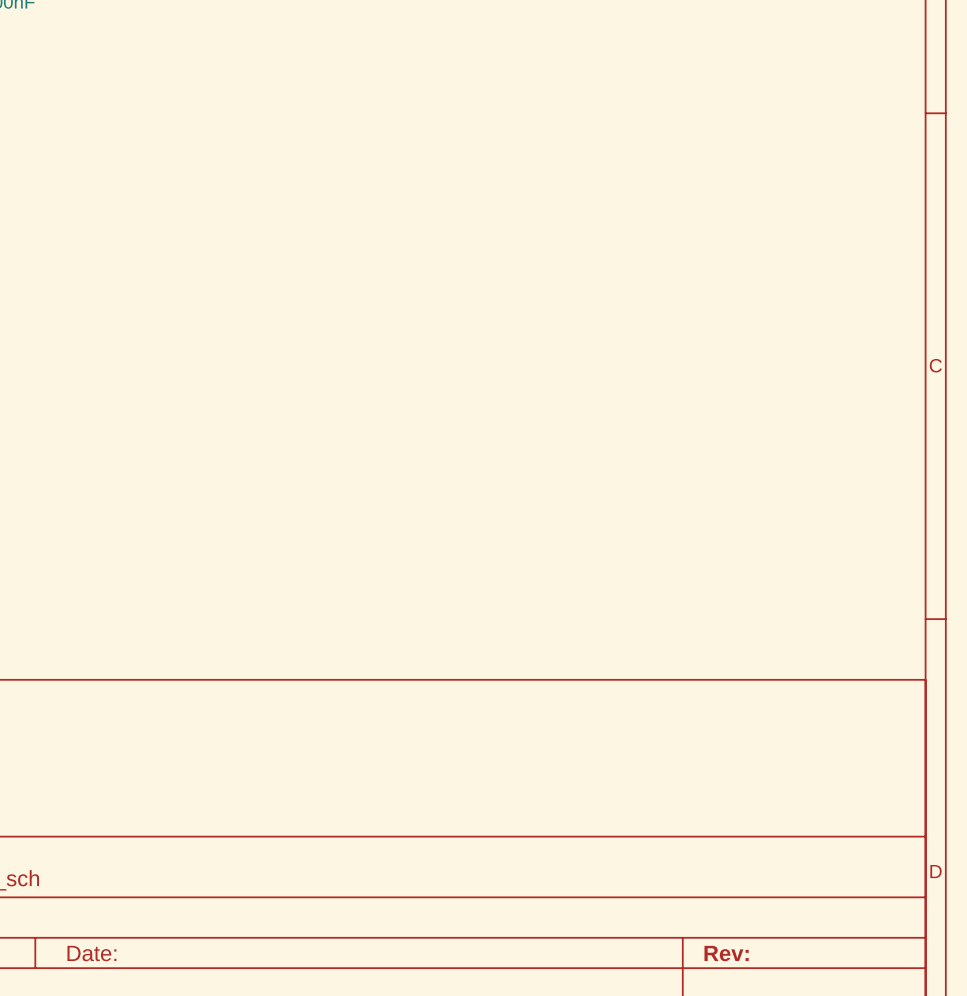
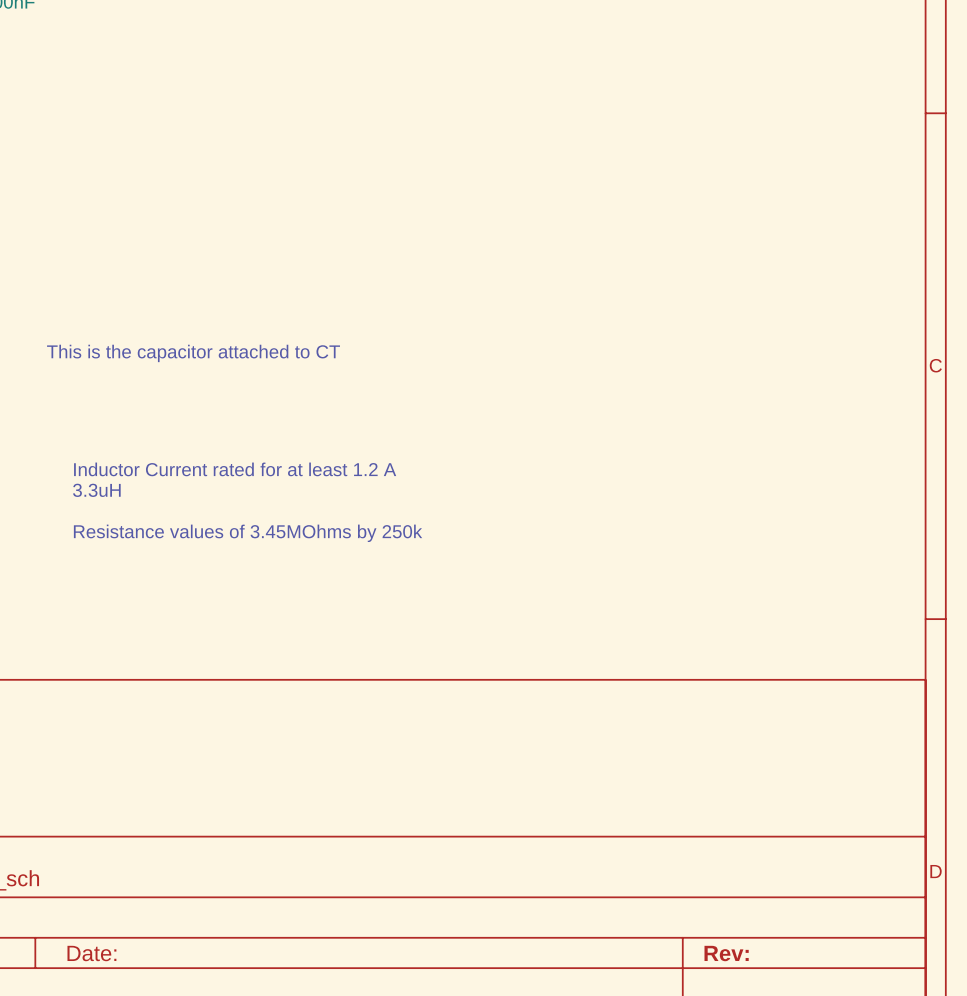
text: none -> This is the capacitor attached to CT (193, 353)
text: none -> Inductor Current rated for at least 1.2 A (235, 469)
text: none -> 3.3uH (96, 490)
text: none -> Resistance values of 3.45MOhms by 250k (248, 533)

